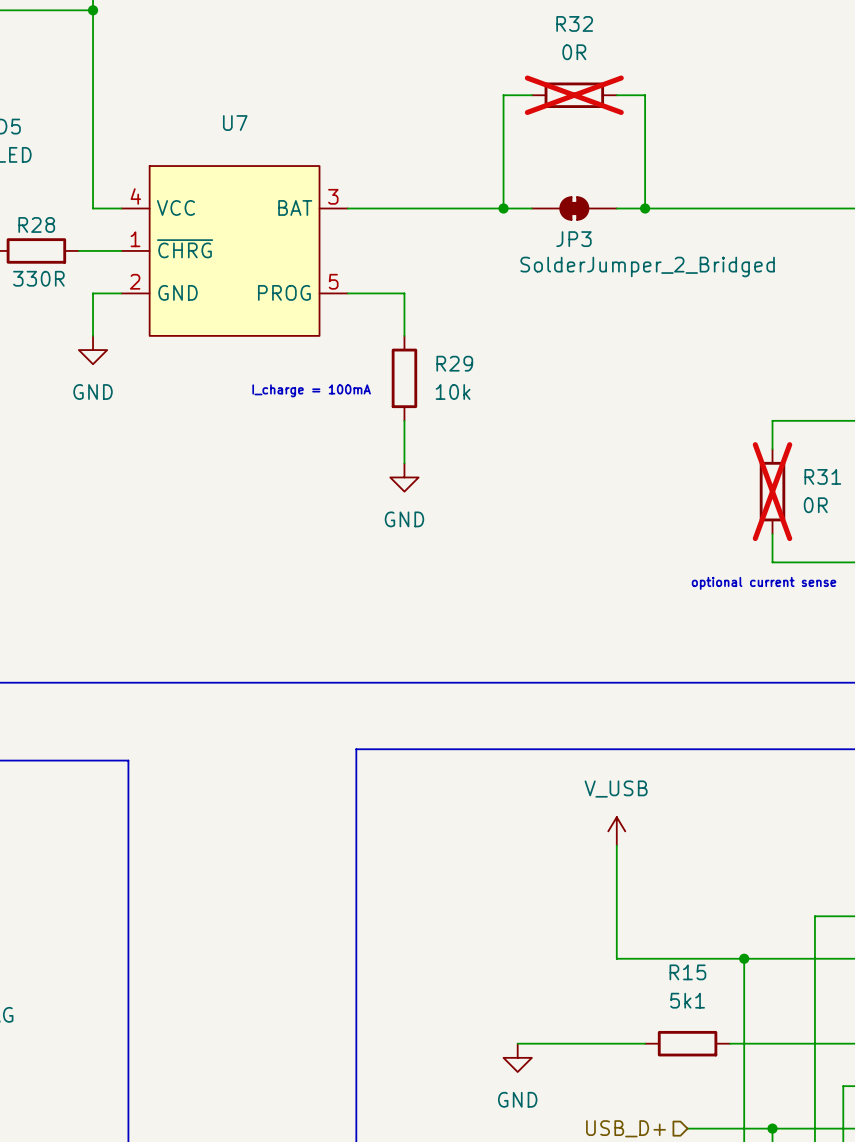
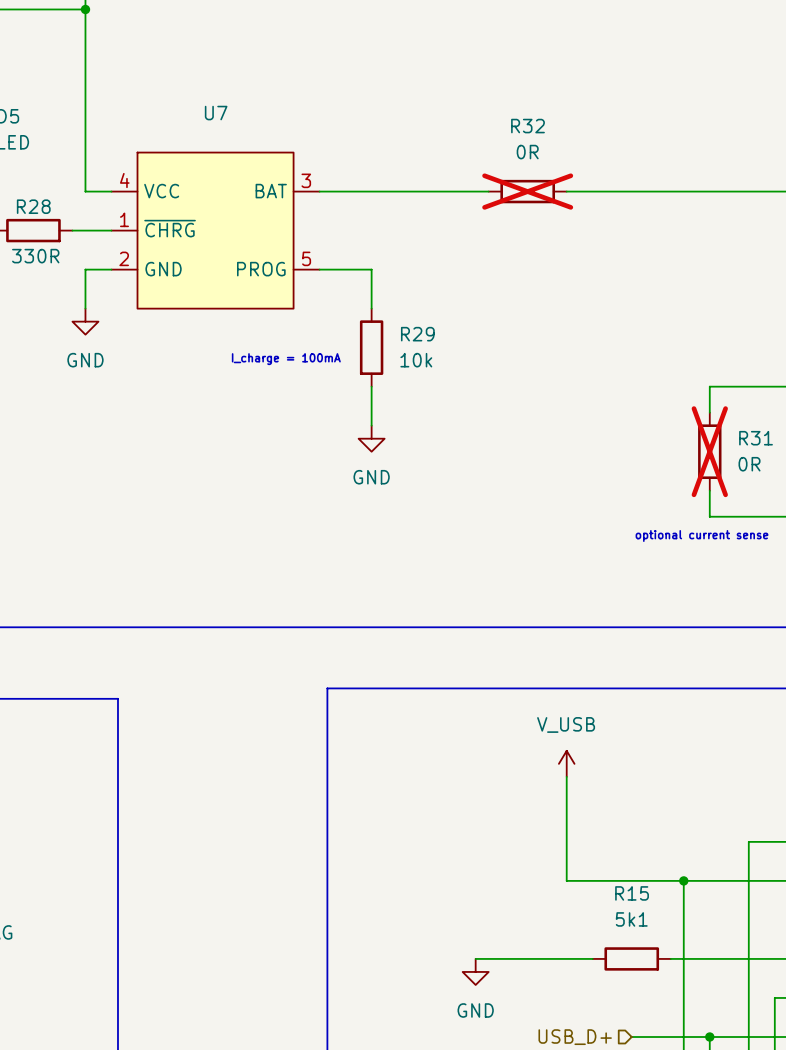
wire: (531, 95) (503, 95) (503, 208) -> none
R32 position: (574, 95) -> (527, 191)
wire: (616, 95) (645, 95) (645, 208) -> none
junction: (503, 208) -> none
JP3: SolderJumper_2_Bridged (574, 208) -> none
junction: (645, 208) -> none

